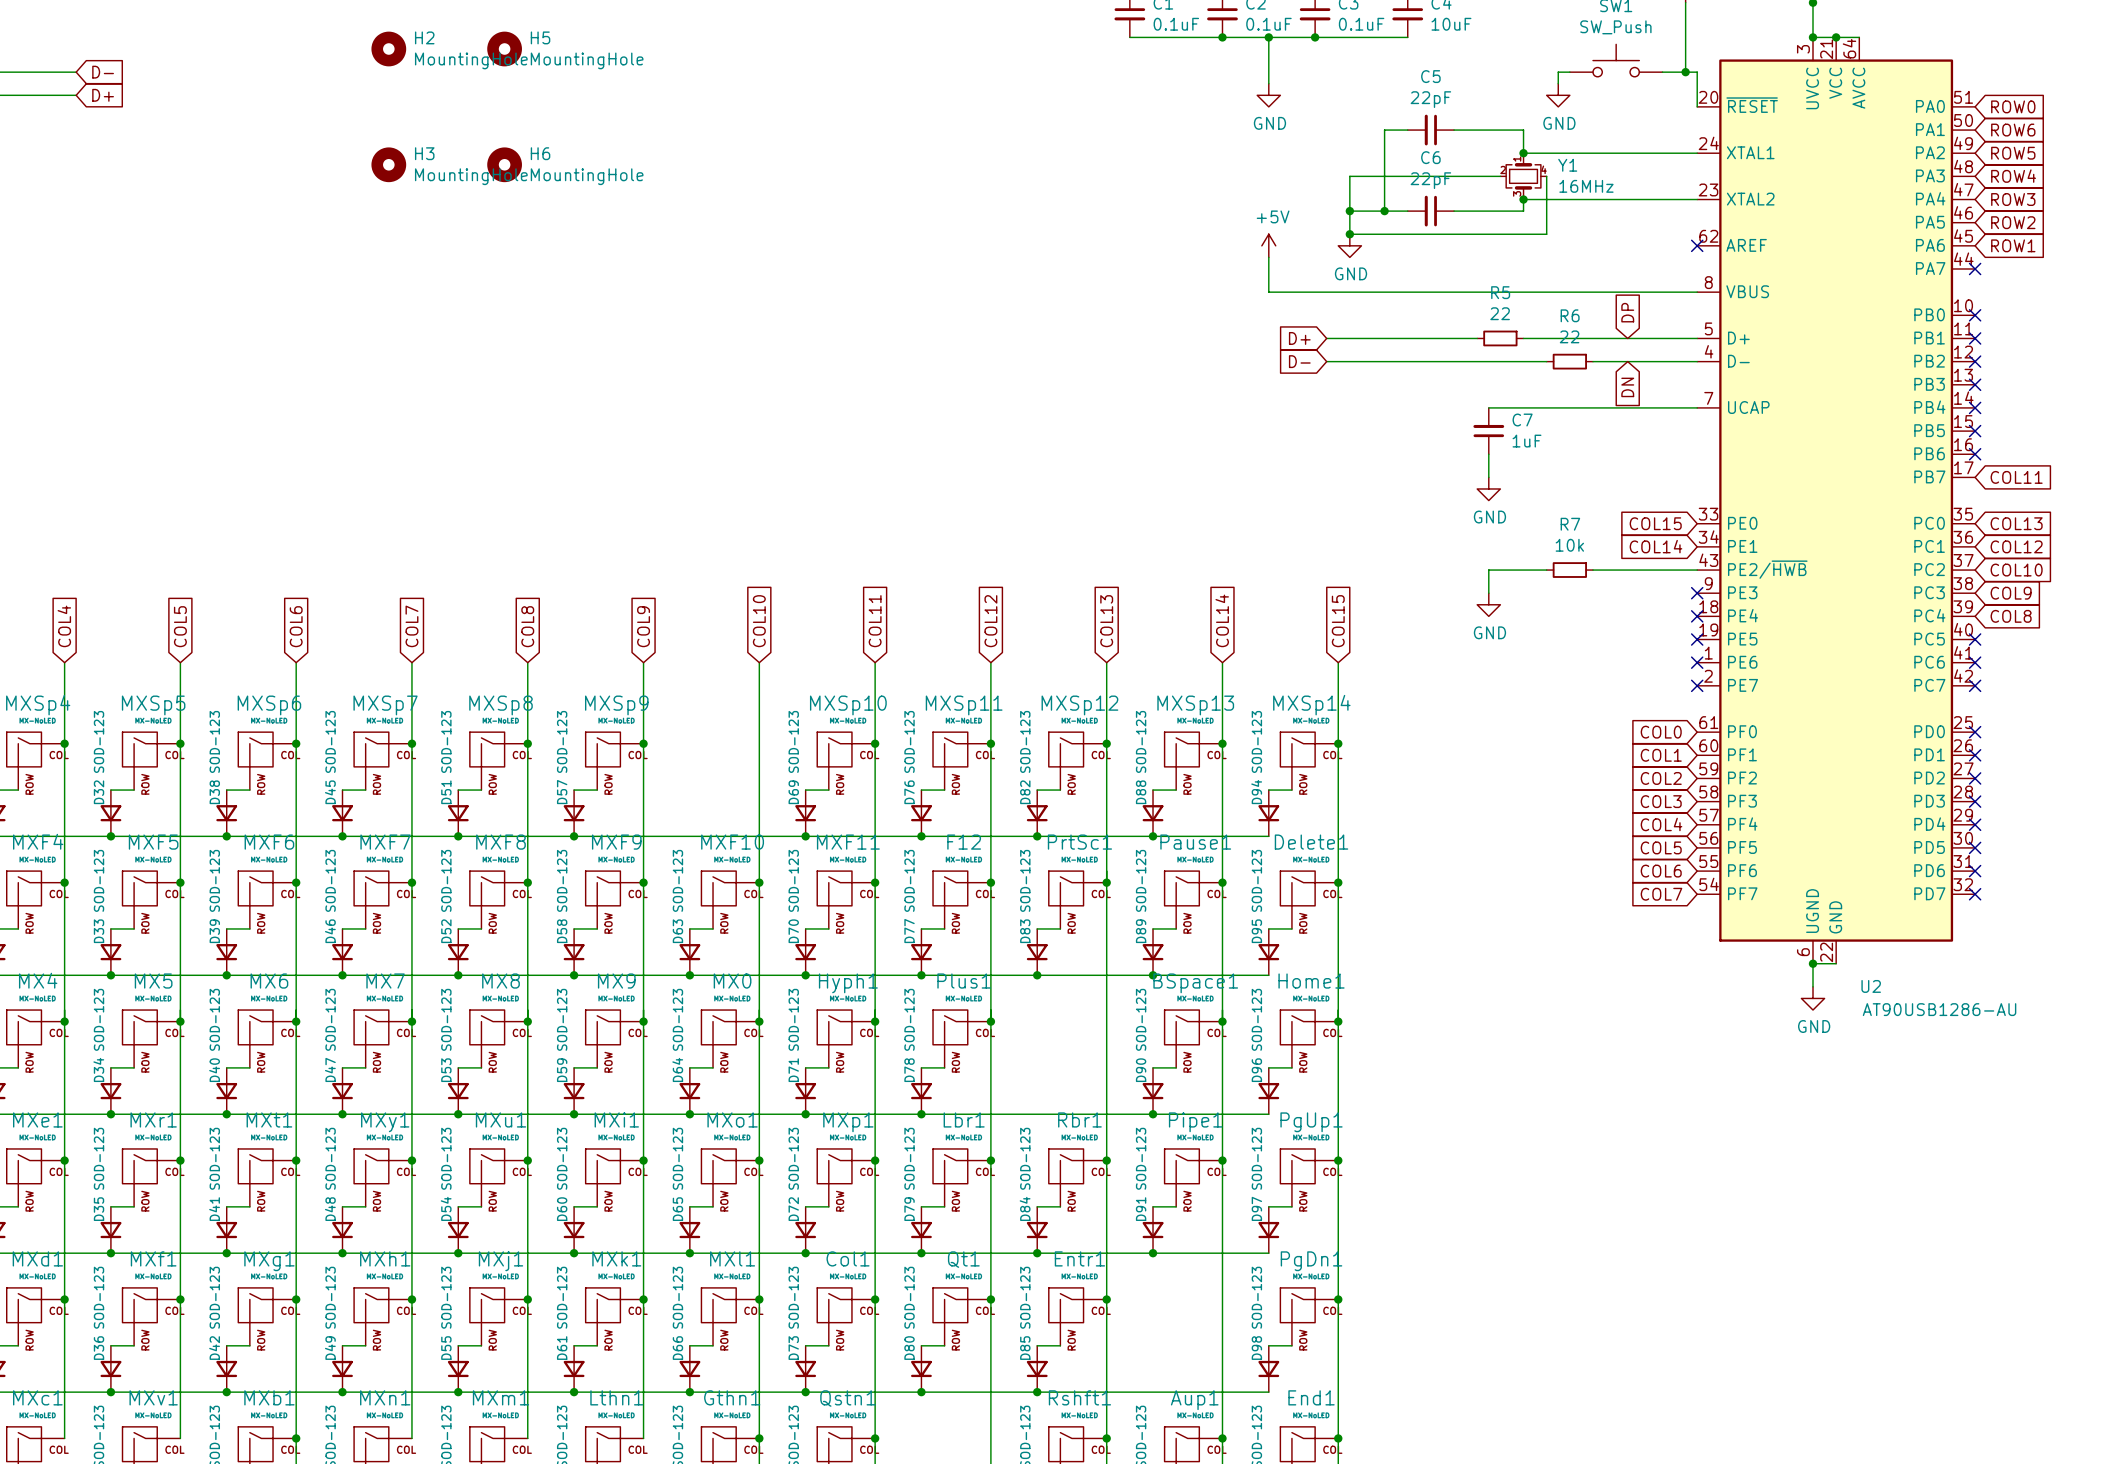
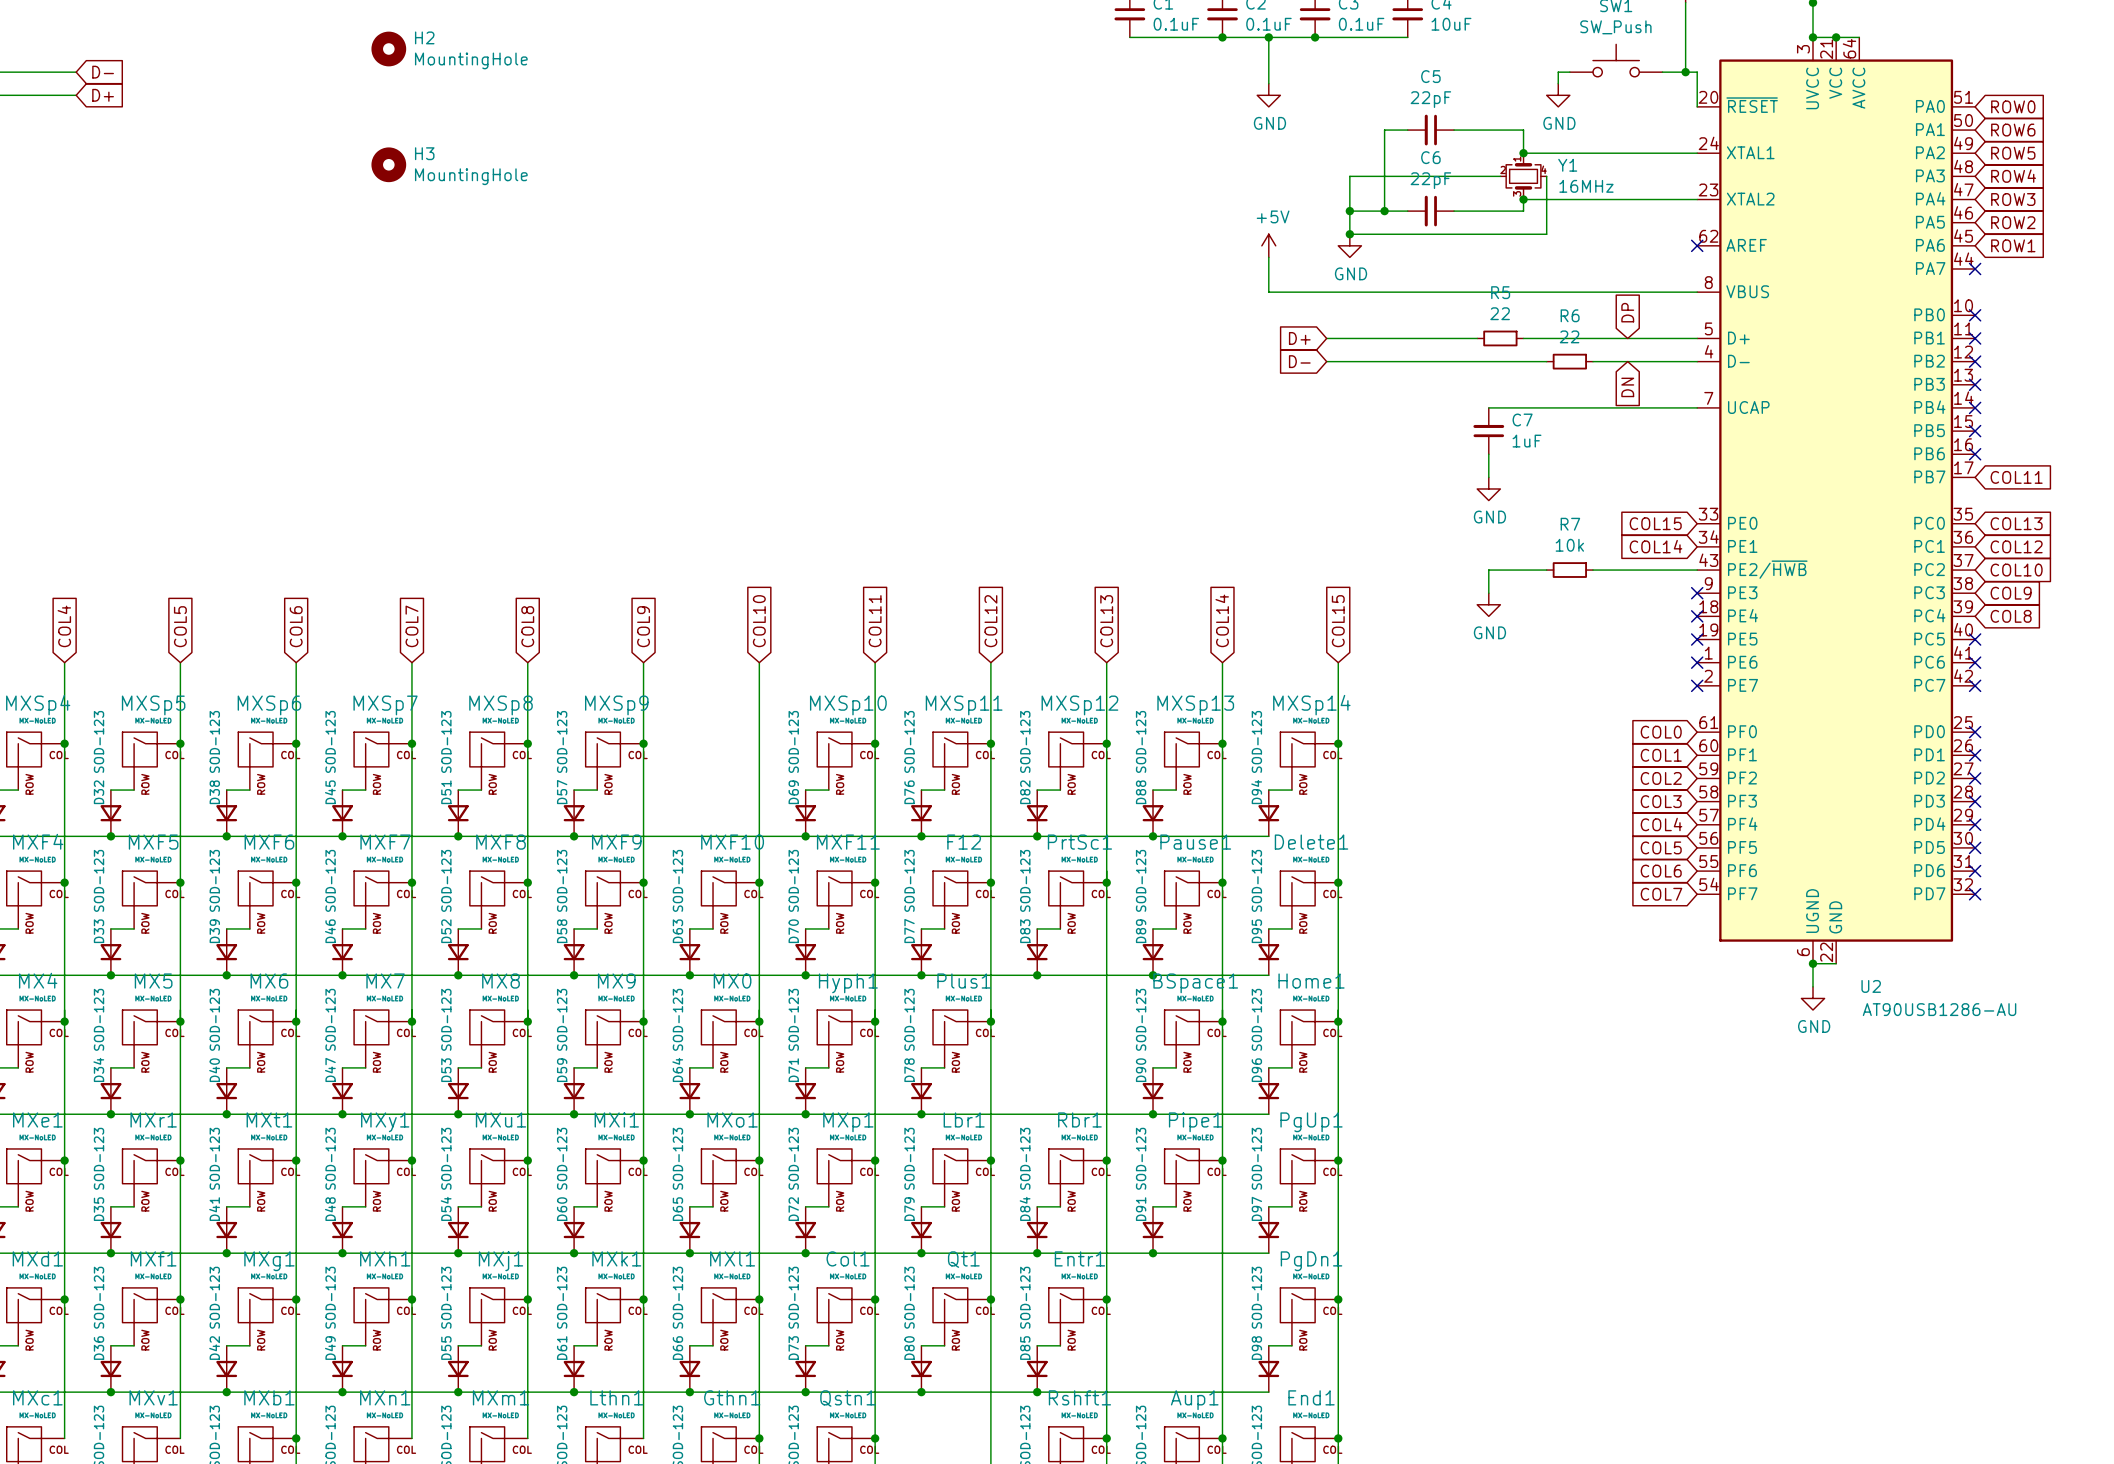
H5: MountingHole (504, 48) -> none
H6: MountingHole (504, 164) -> none

